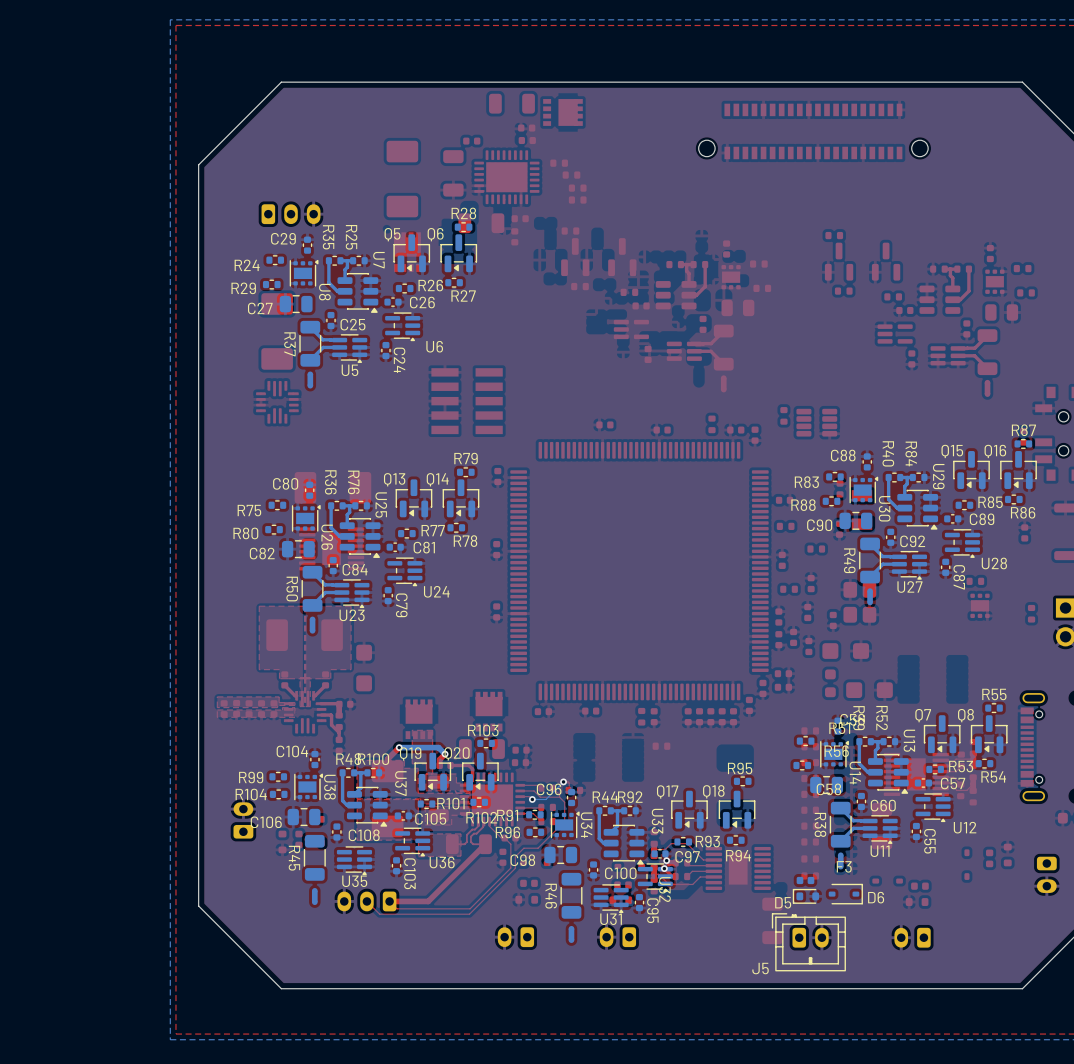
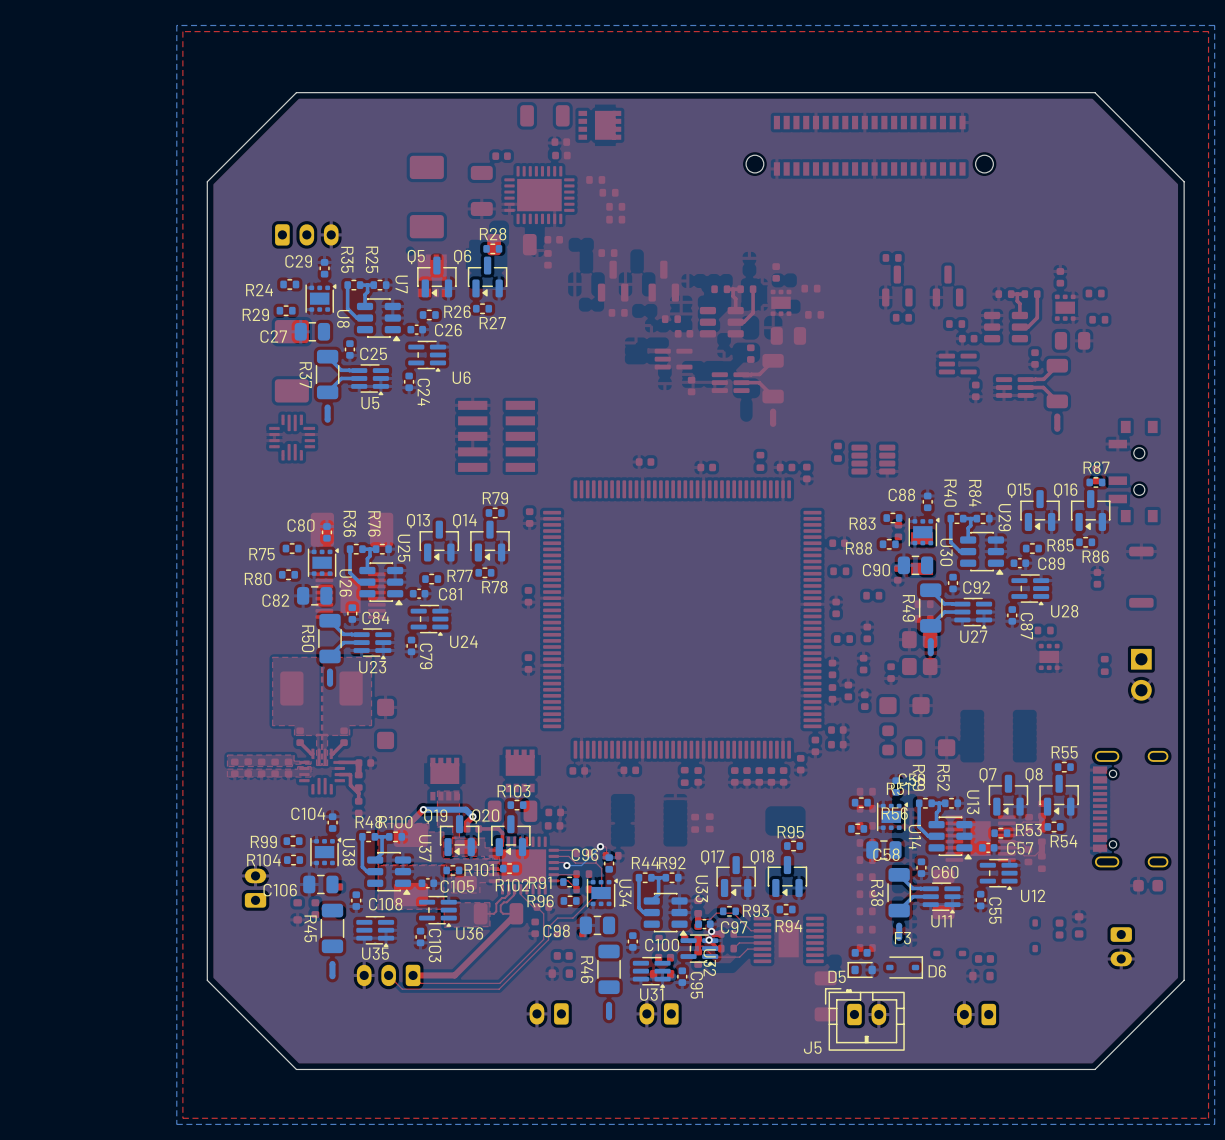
part: none -> (924, 604)
part: none -> (924, 618)
part: (661, 746) -> none
part: none -> (709, 822)
part: none -> (695, 823)

